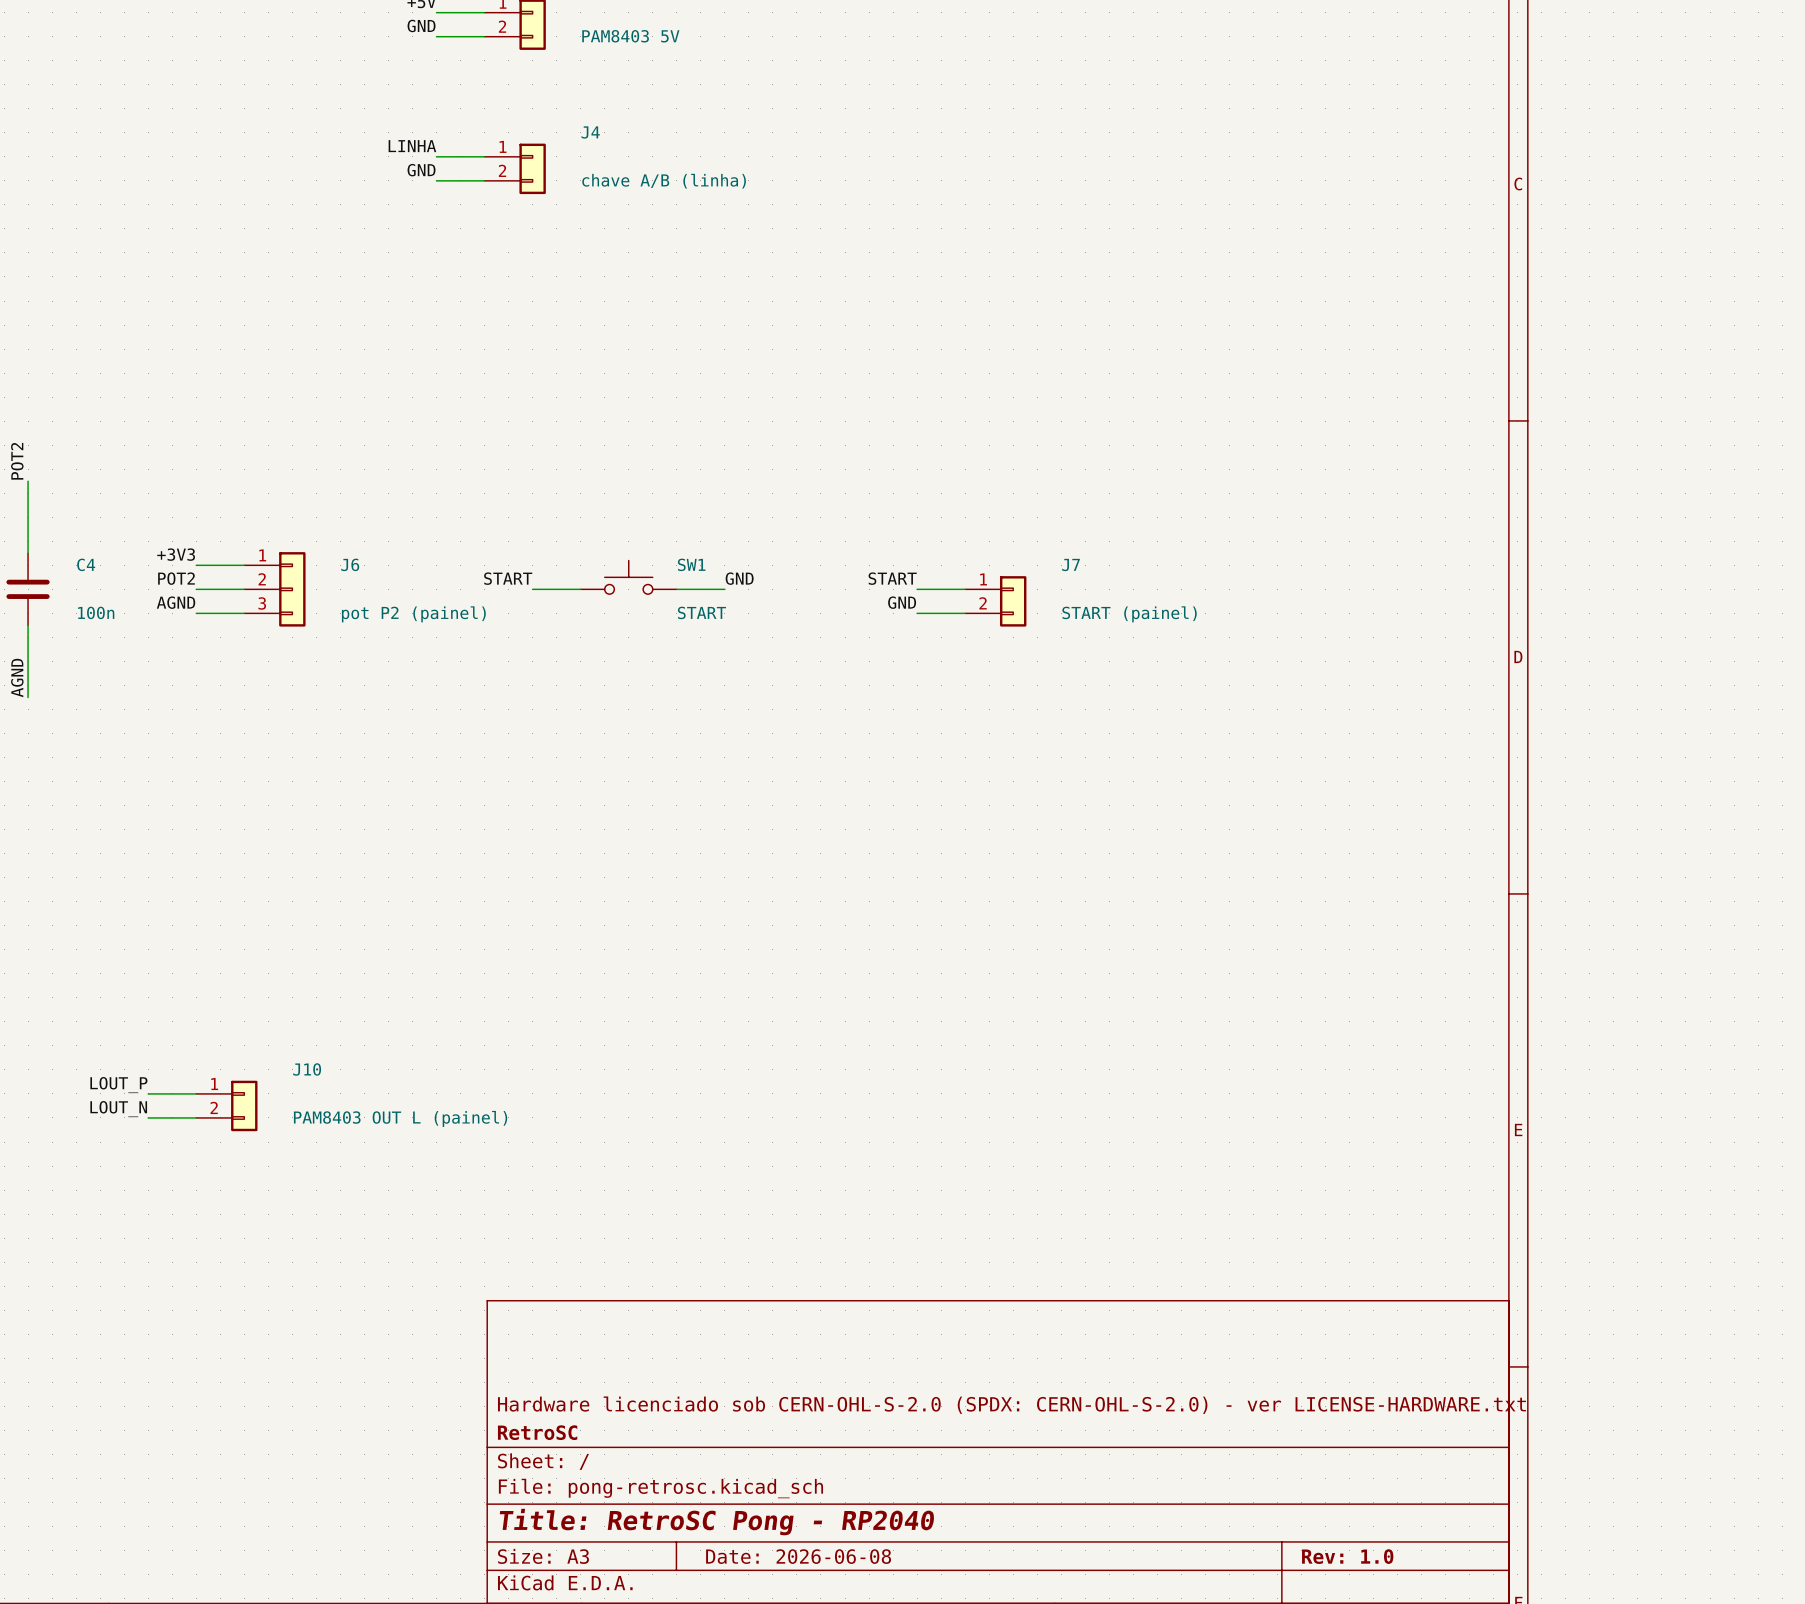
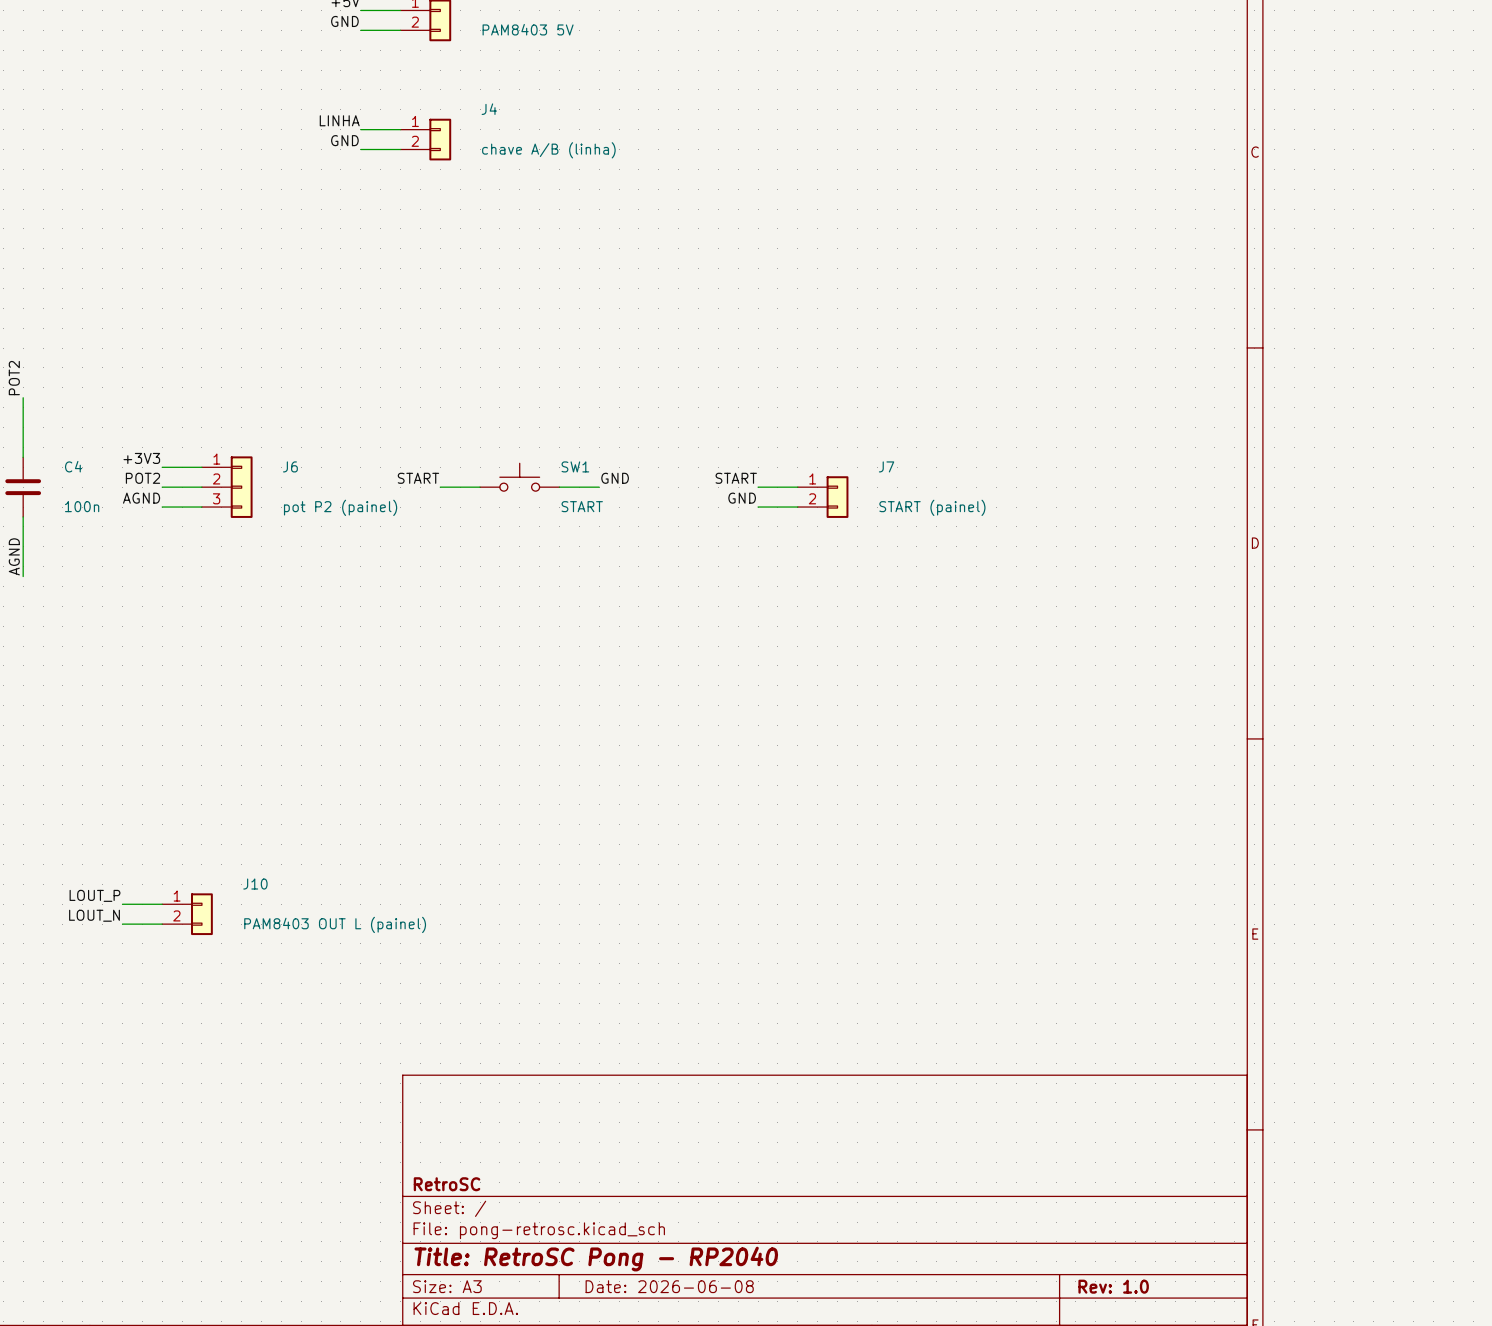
title block: Hardware licenciado sob CERN-OHL-S-2.0 (SPDX: CERN-OHL-S-2.0) - ver LICENSE-HARDWARE.txt (1011, 1405) -> none

